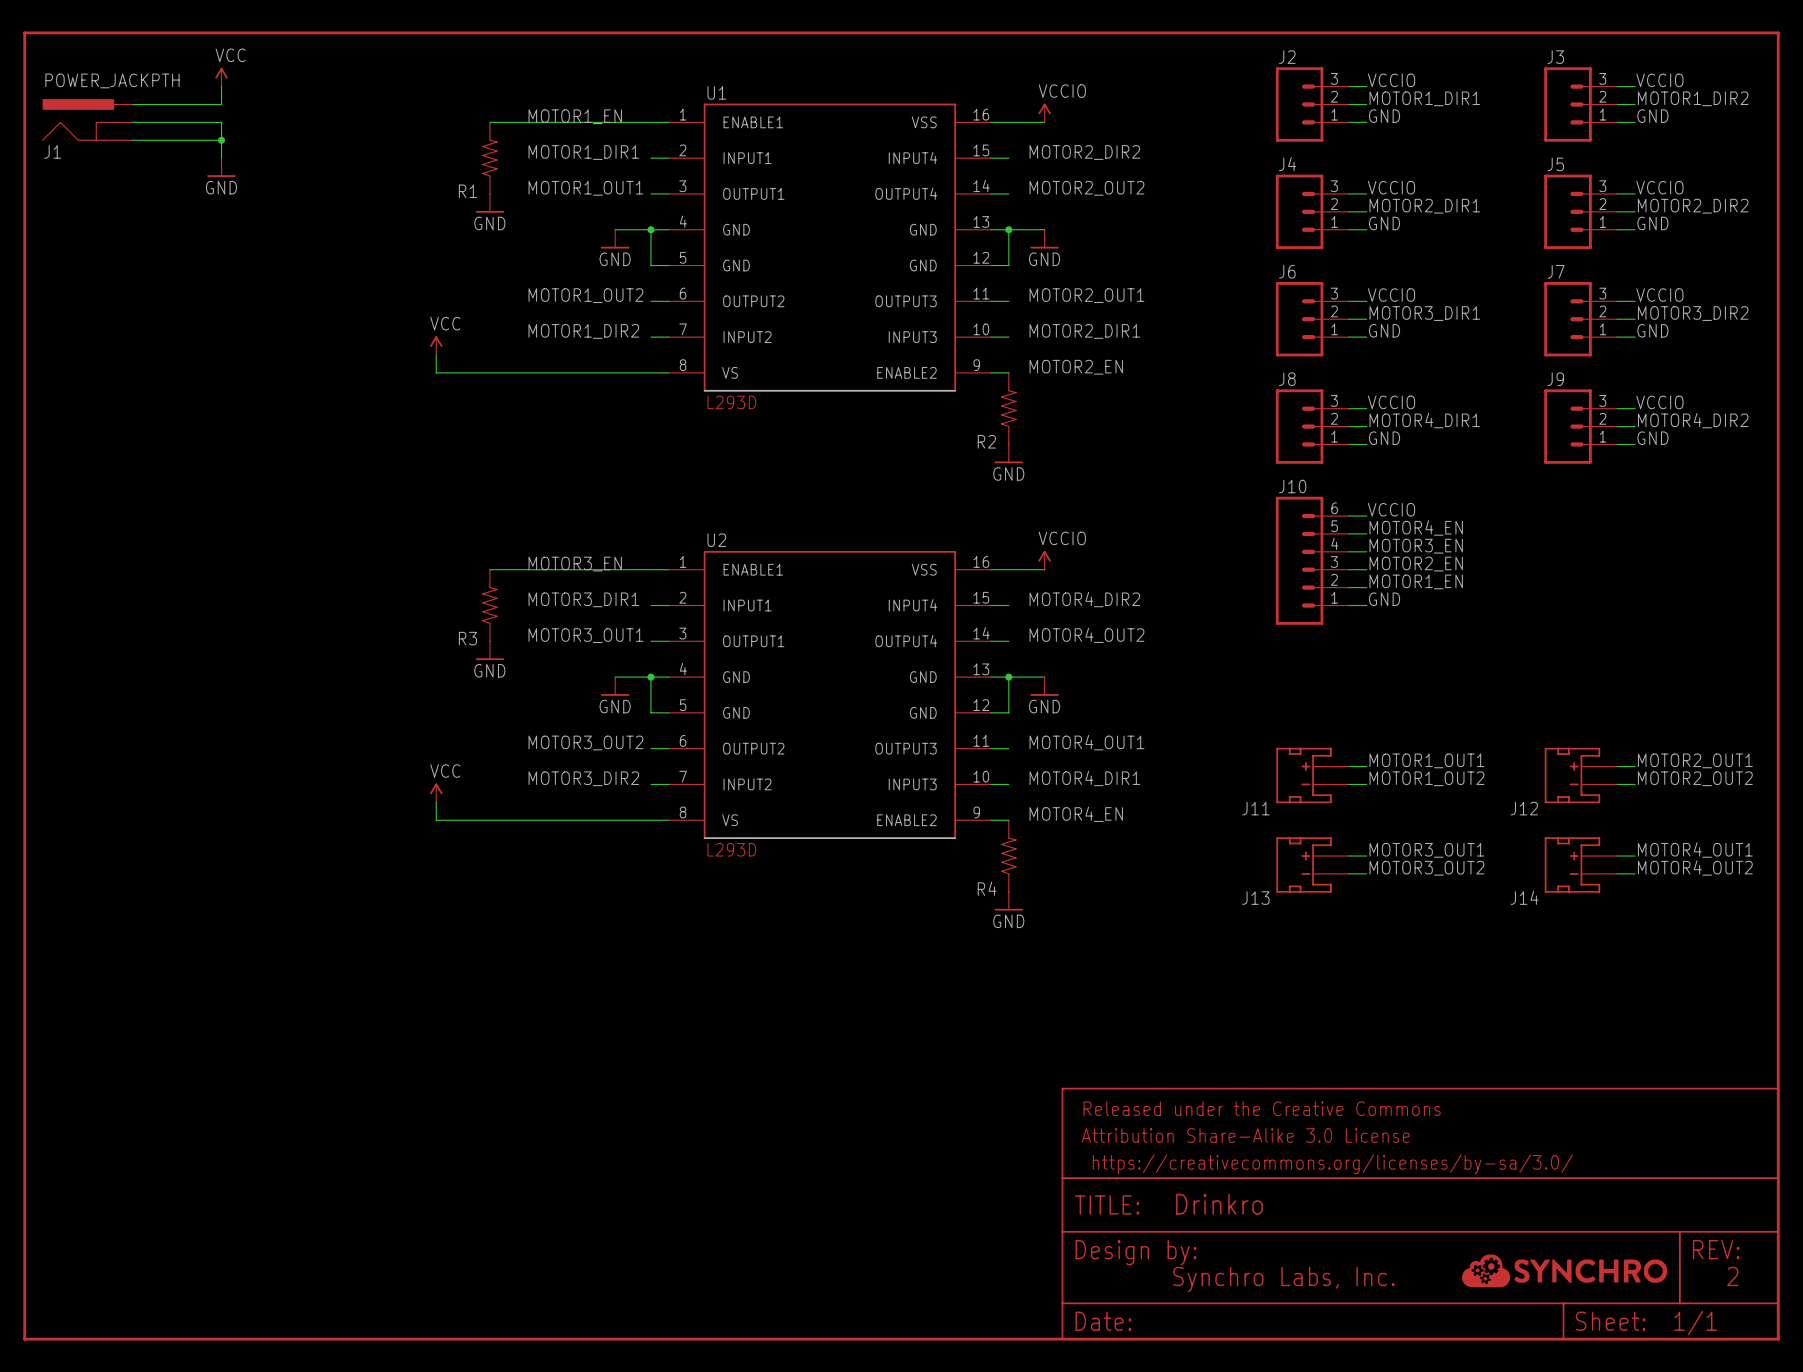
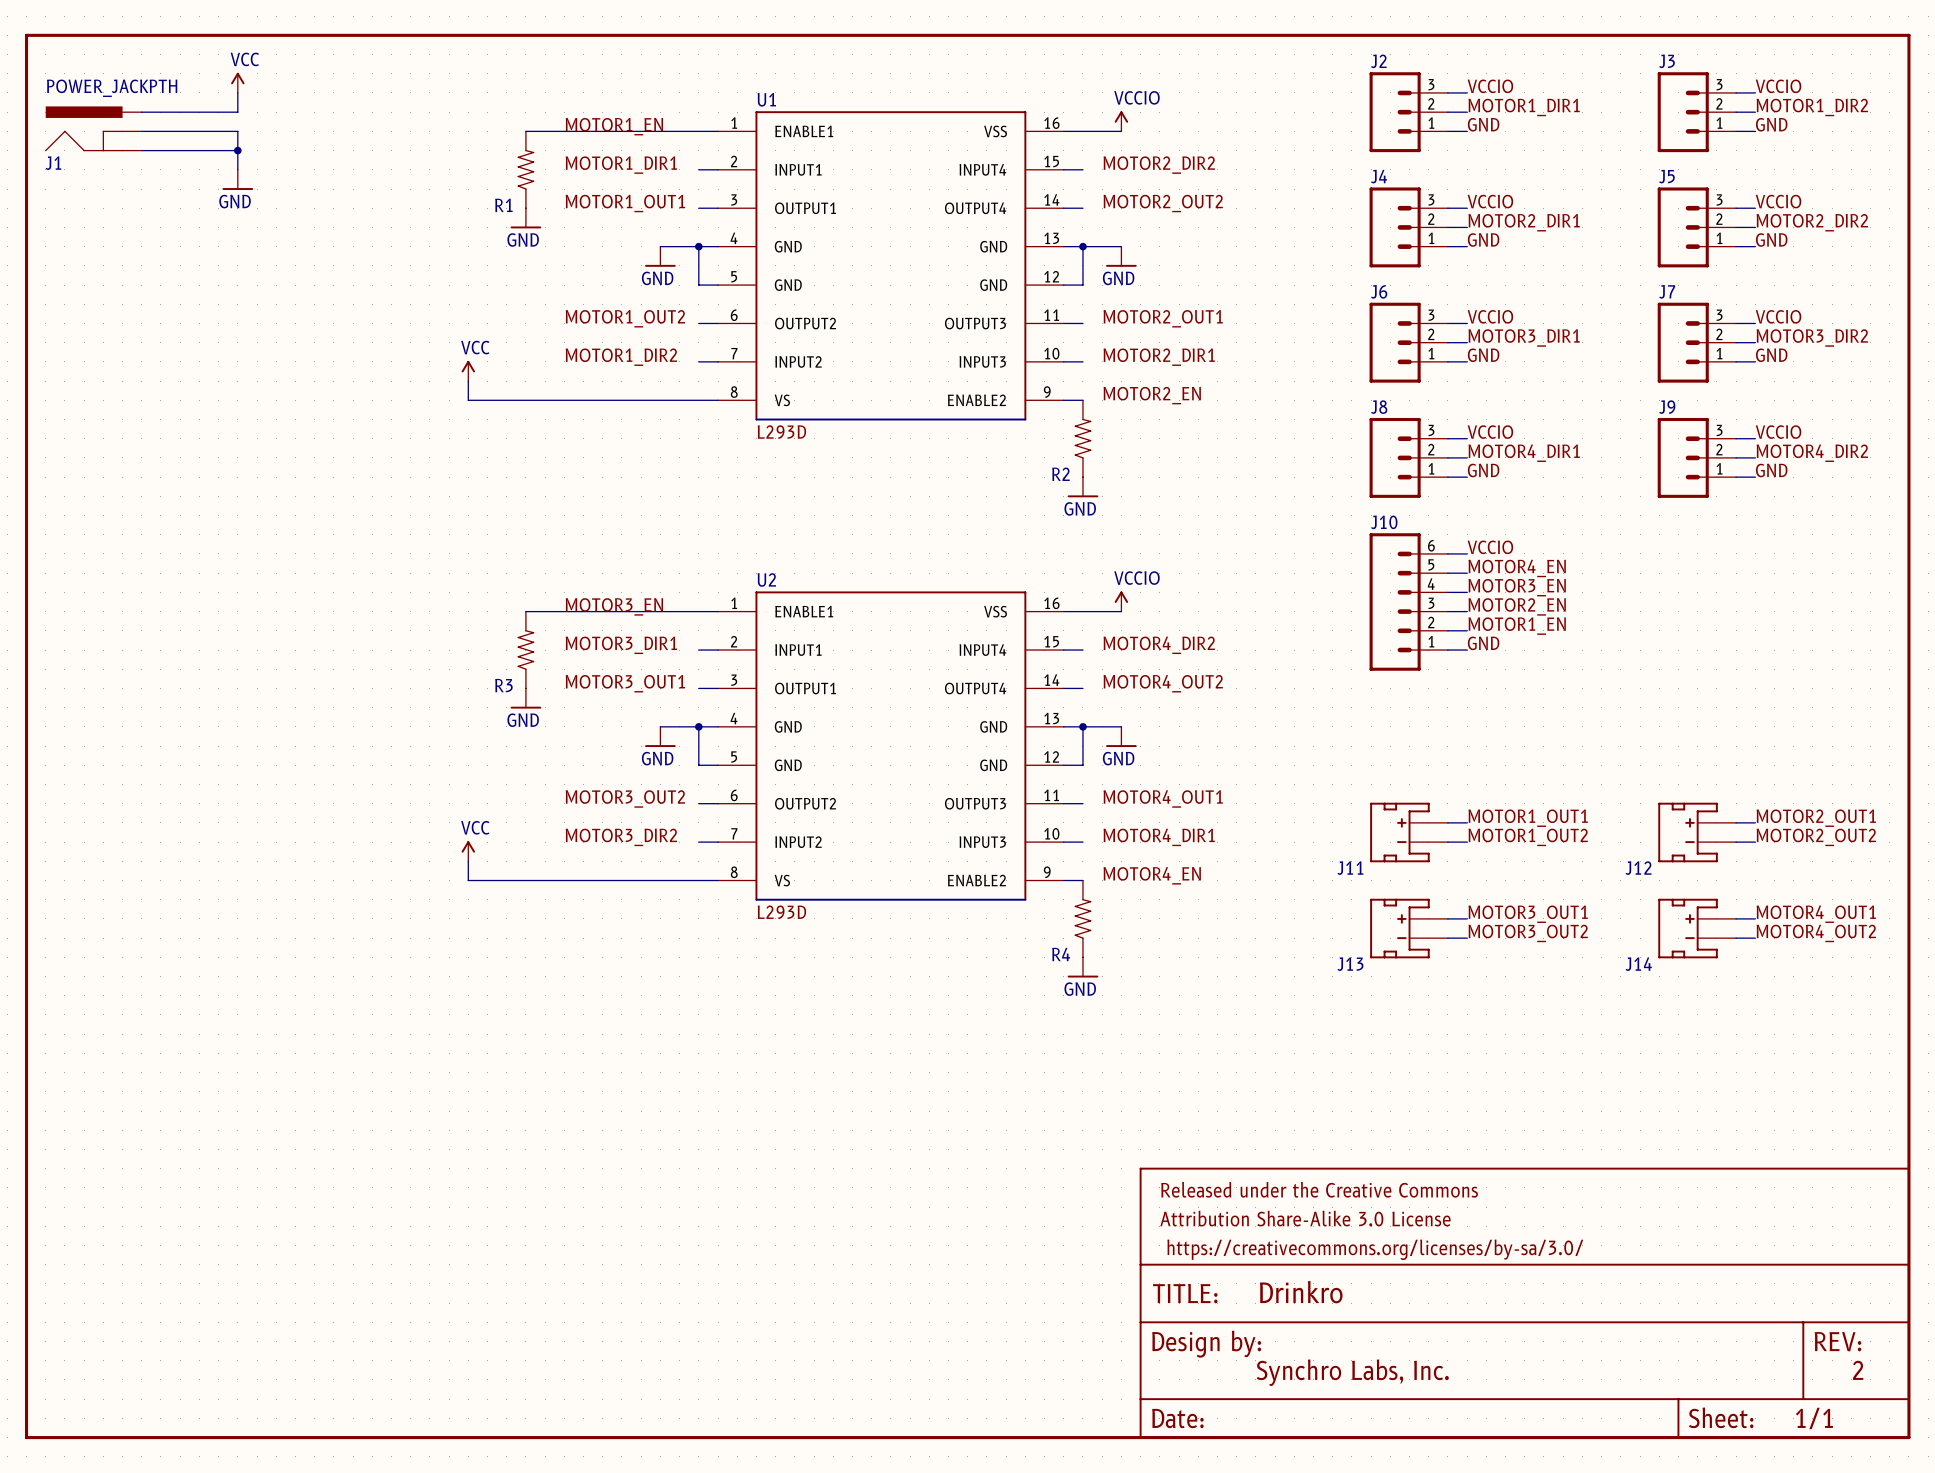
drawing: [1462, 1254, 1668, 1288] -> none

